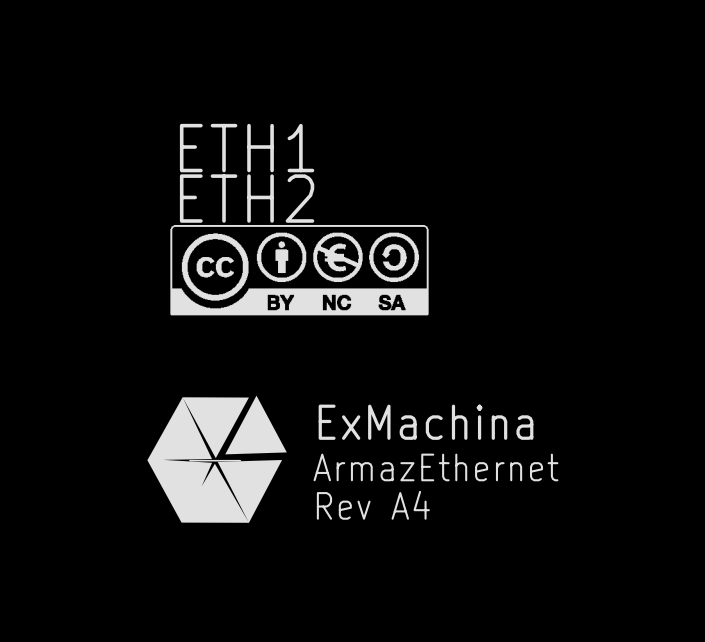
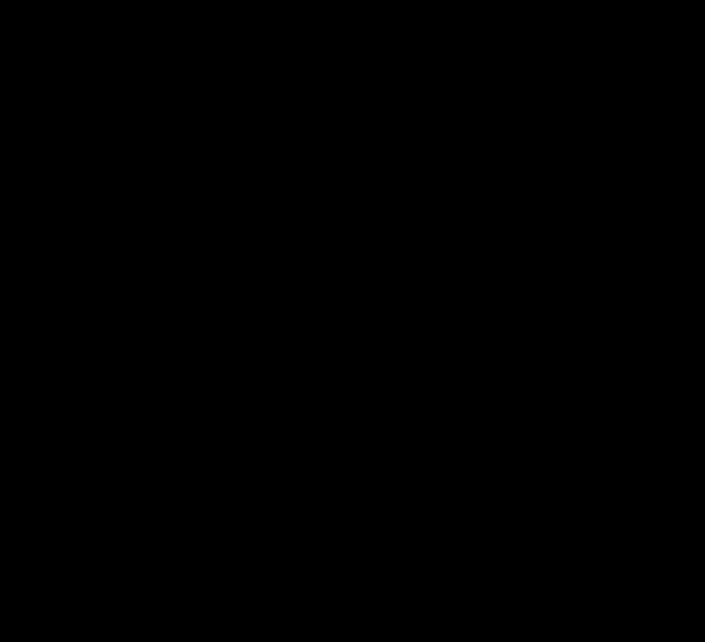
text: ETH1 (247, 148) -> none
text: ETH2 (247, 198) -> none
drawing: [170, 224, 429, 316] -> none
drawing: [147, 395, 287, 523] -> none
text: ArmazEthernet (435, 467) -> none
text: Rev A4 (373, 505) -> none

